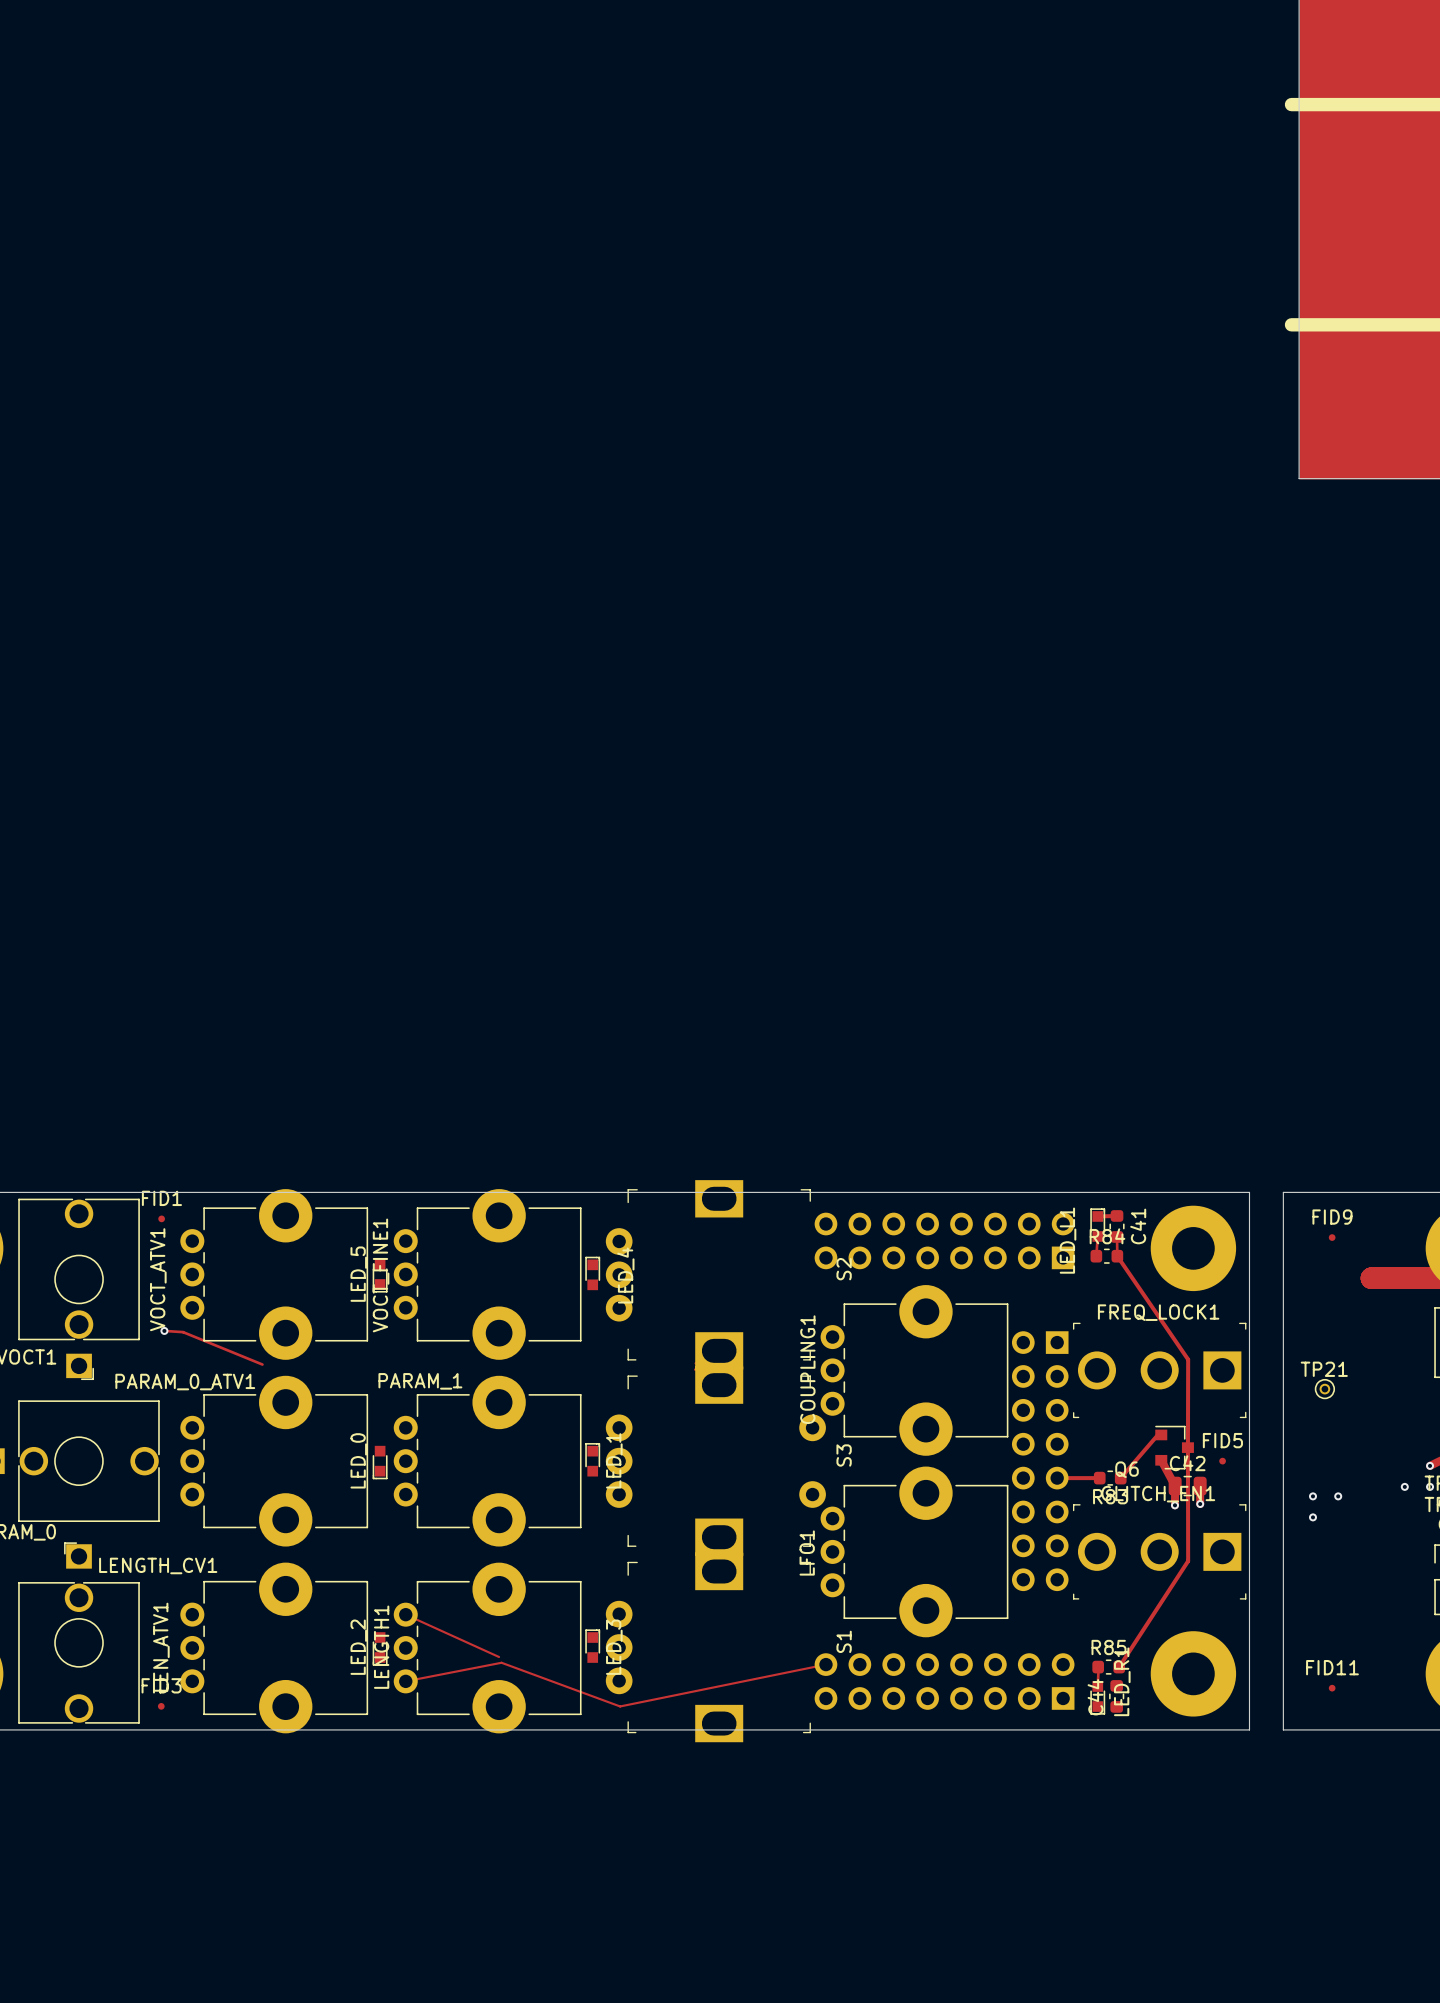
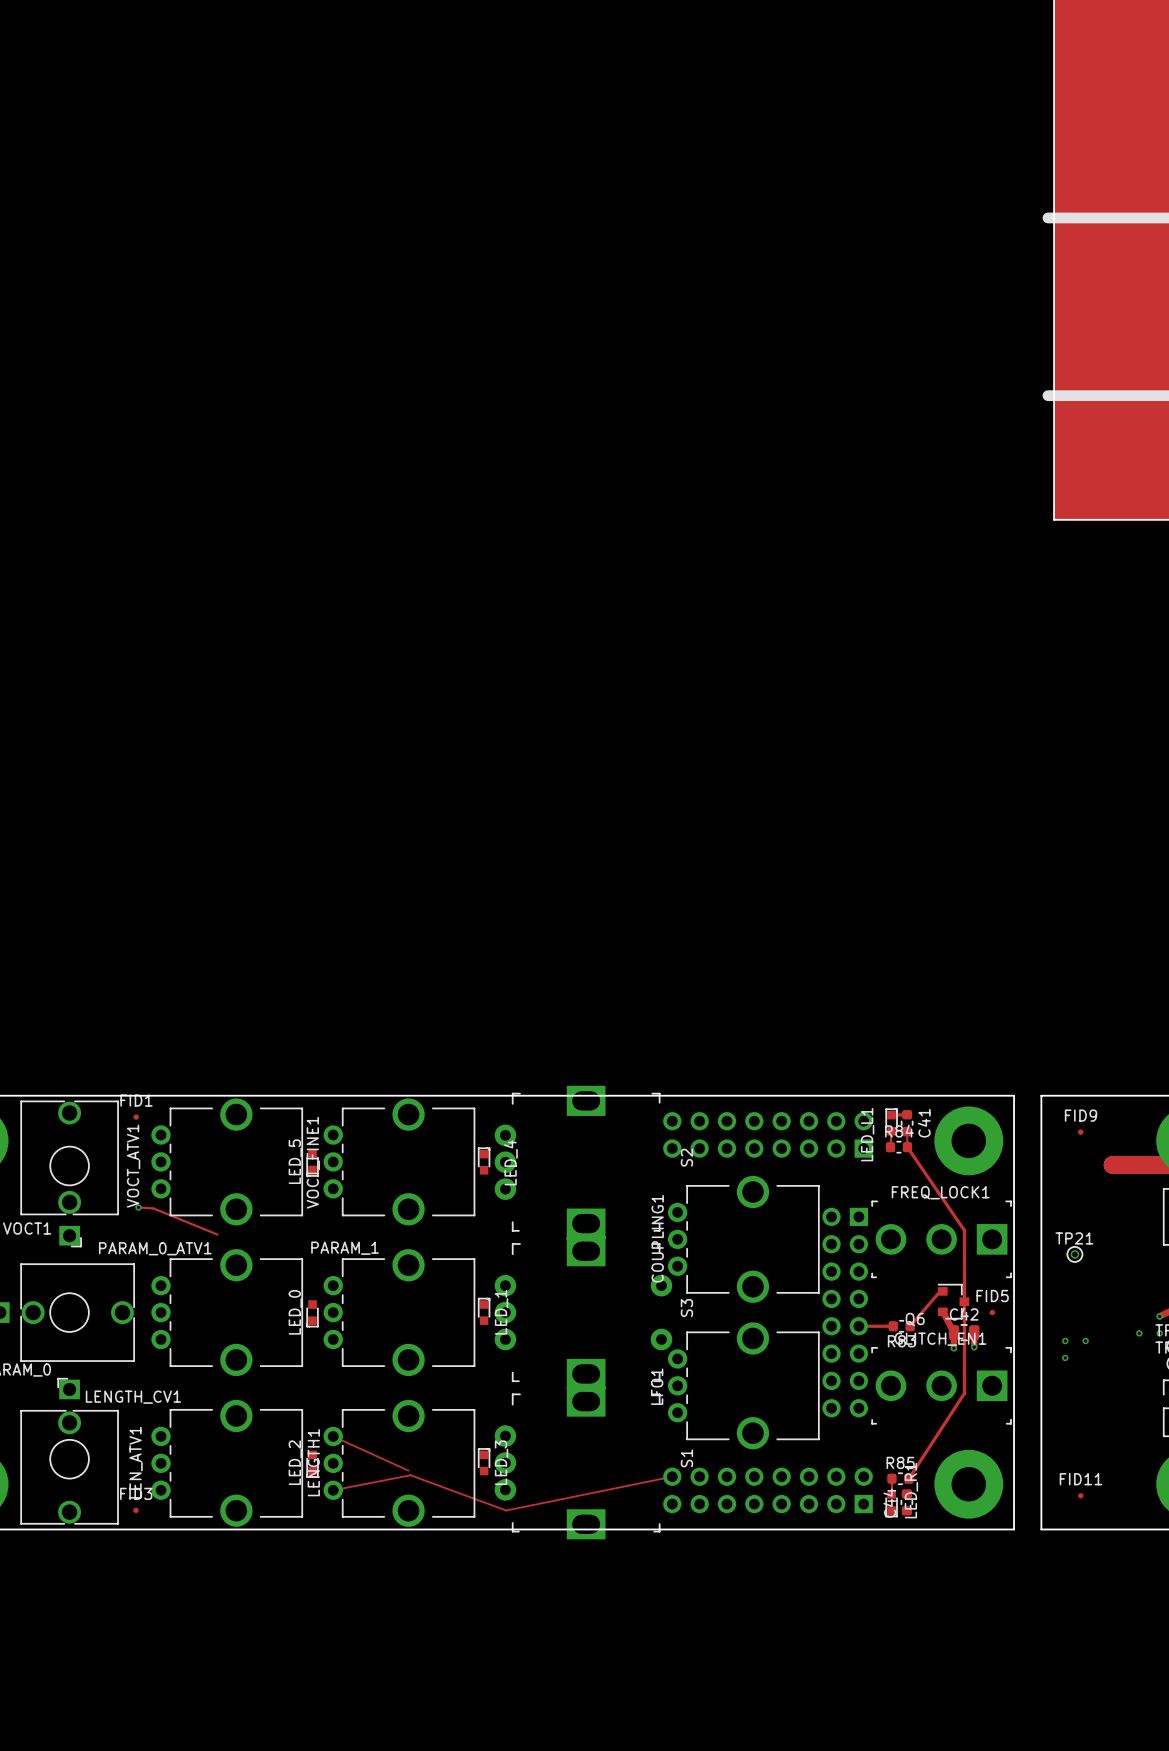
VOCT_ATV1 footprint: [180, 1189, 369, 1360] -> [151, 1098, 303, 1226]
VOCT_FINE1 footprint: [393, 1189, 582, 1360] -> [323, 1098, 476, 1226]
COUPLING1 footprint: [820, 1285, 1009, 1456] -> [667, 1175, 820, 1303]
PARAM_0_ATV1 footprint: [180, 1375, 369, 1547] -> [151, 1249, 303, 1377]
PARAM_1 footprint: [393, 1375, 582, 1547] -> [323, 1249, 476, 1377]
LFO1 footprint: [820, 1466, 1009, 1638] -> [667, 1322, 820, 1450]
LEN_ATV1 footprint: [180, 1562, 369, 1734] -> [151, 1399, 303, 1527]
LENGTH1 footprint: [393, 1562, 582, 1734] -> [323, 1399, 476, 1527]

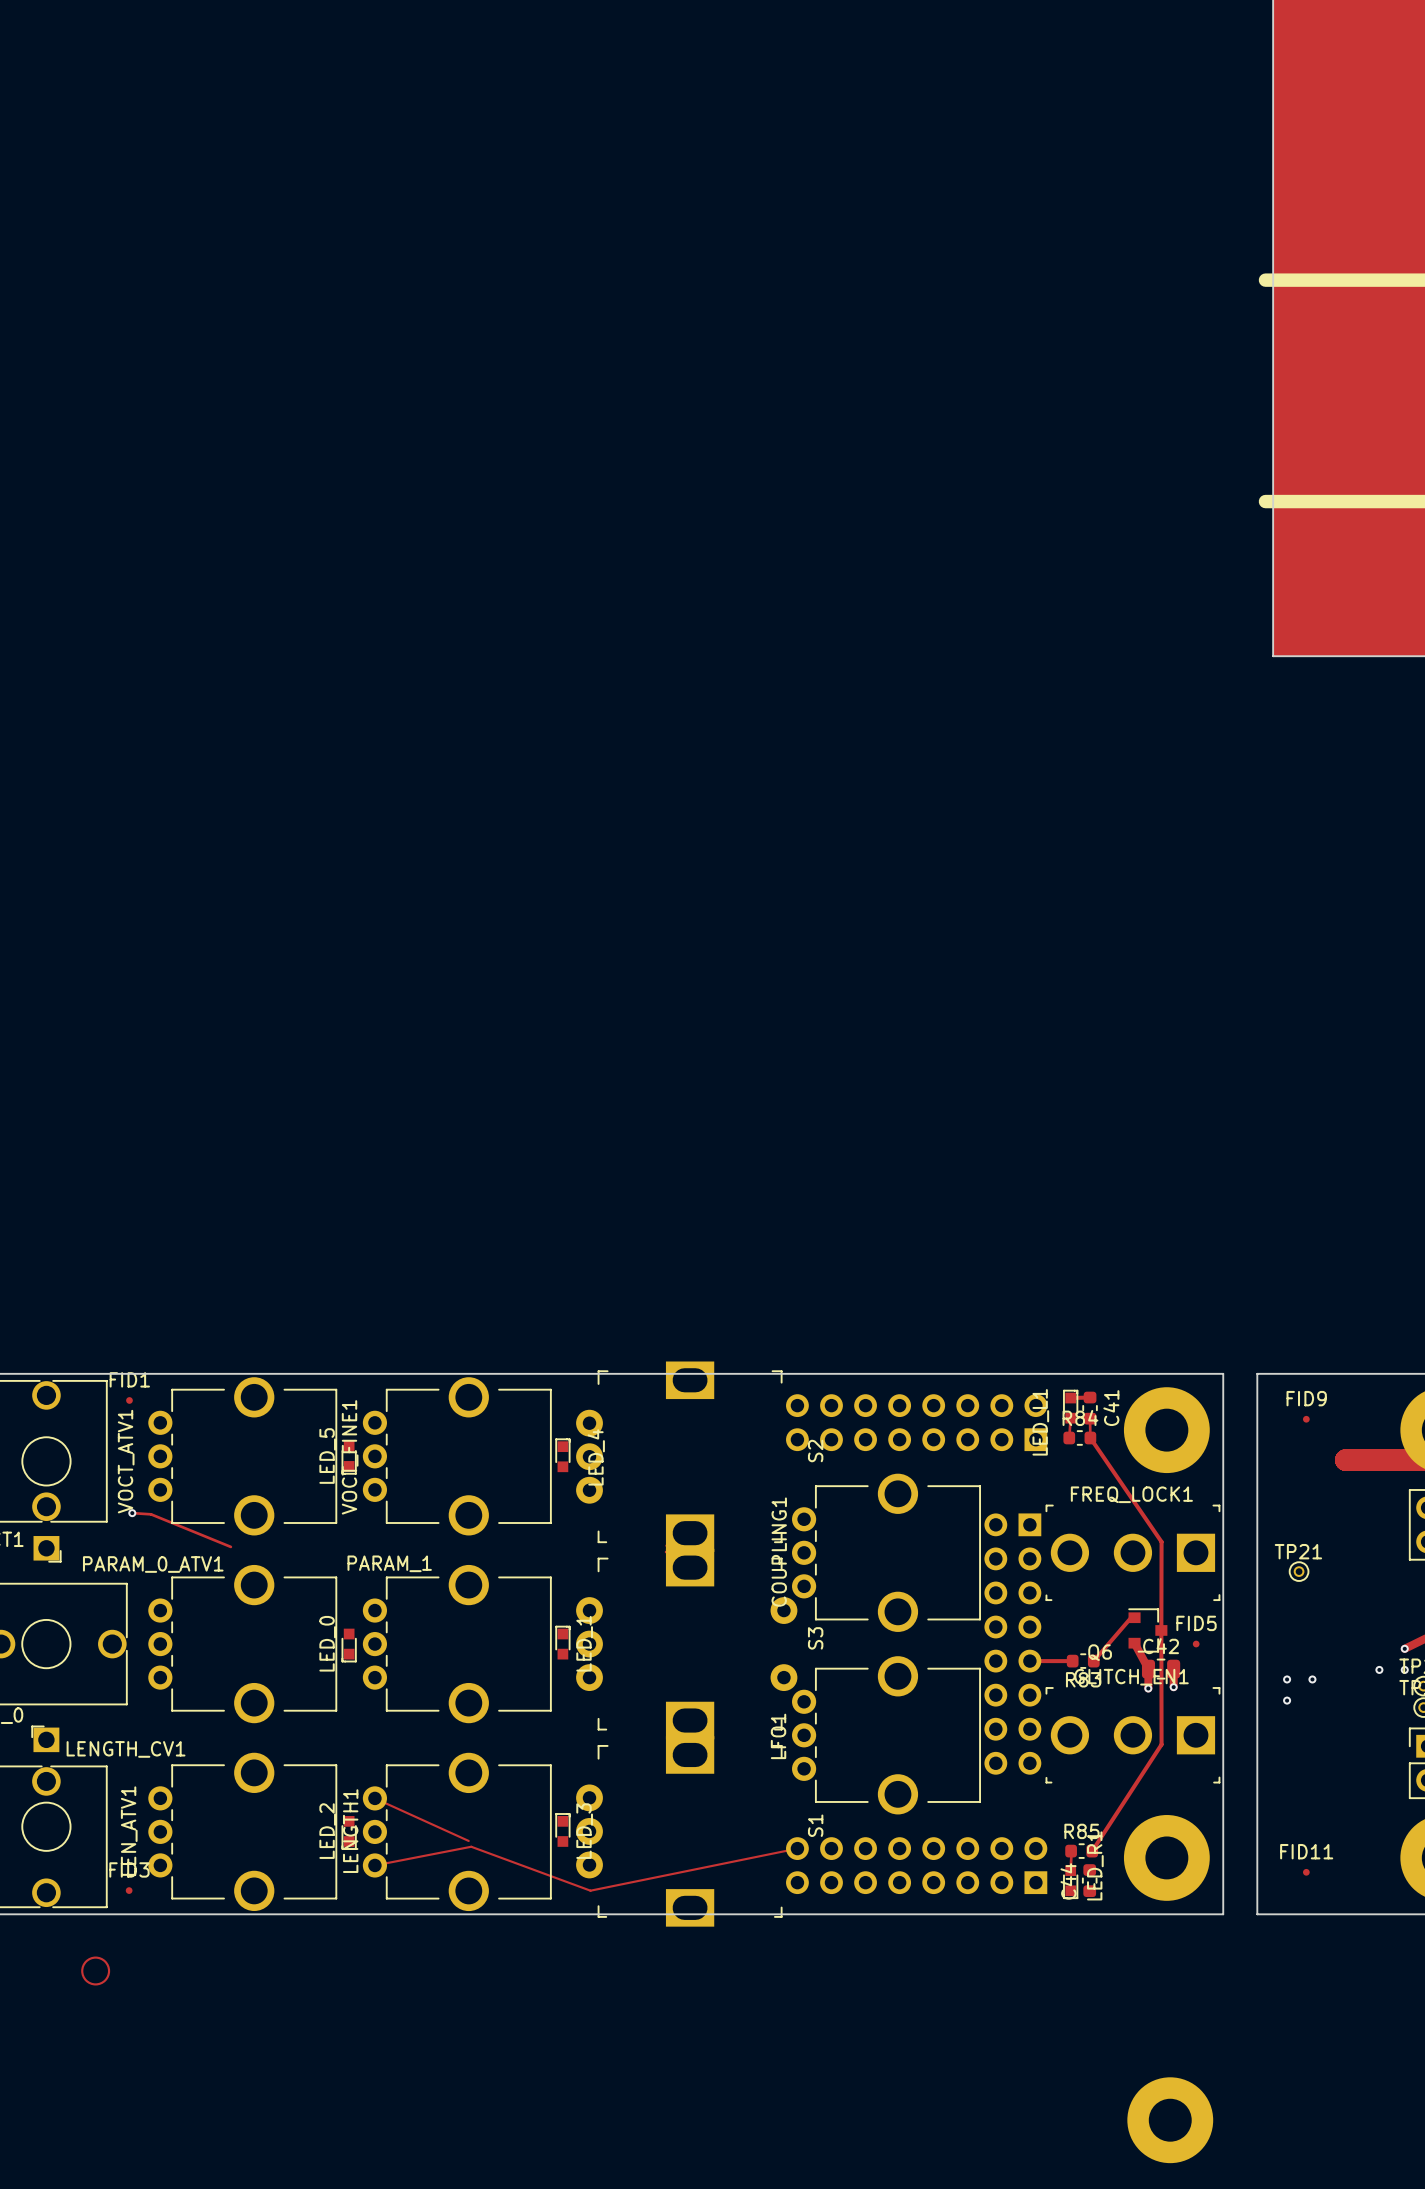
drawing: none -> [81, 1956, 111, 1986]
part: none -> (1170, 2120)

